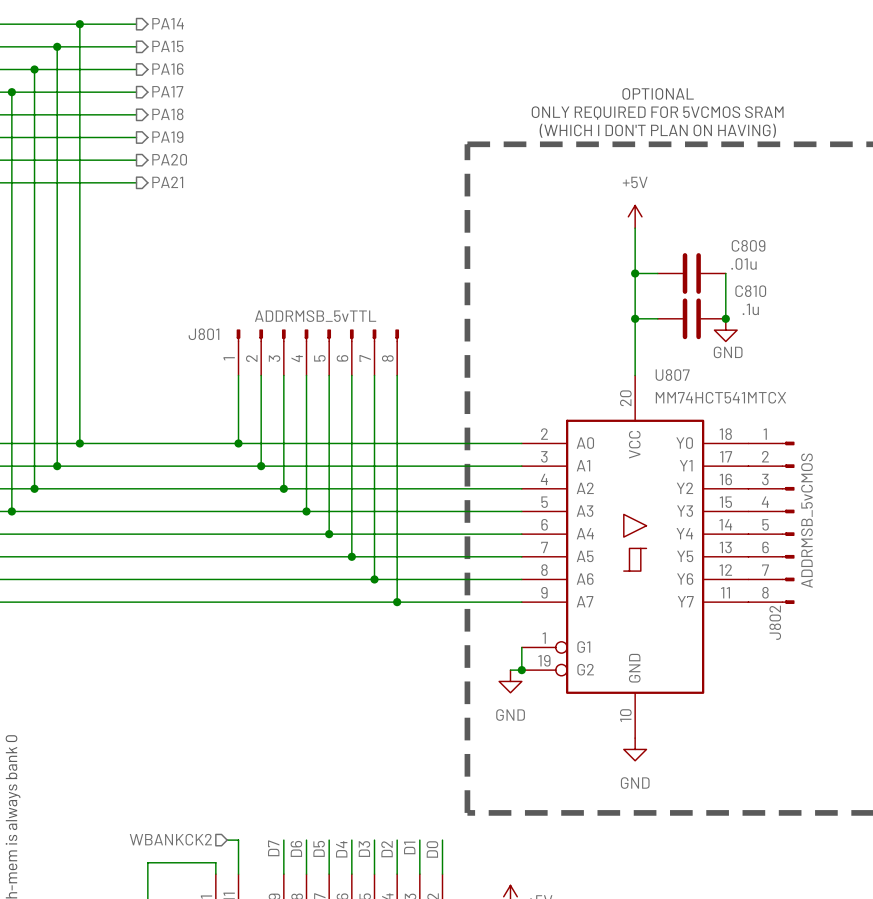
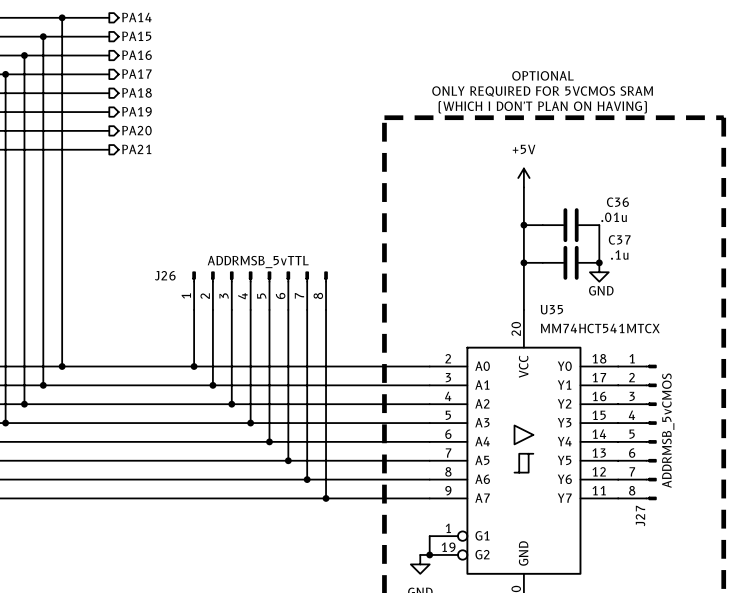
C809 name: C809 (748, 245) -> C36 (617, 202)
C810 name: C810 (750, 291) -> C37 (619, 239)
J801 name: J801 (203, 334) -> J26 (165, 275)
U807 name: U807 (672, 375) -> U35 (551, 309)
J802 name: J802 (775, 622) -> J27 (640, 516)

